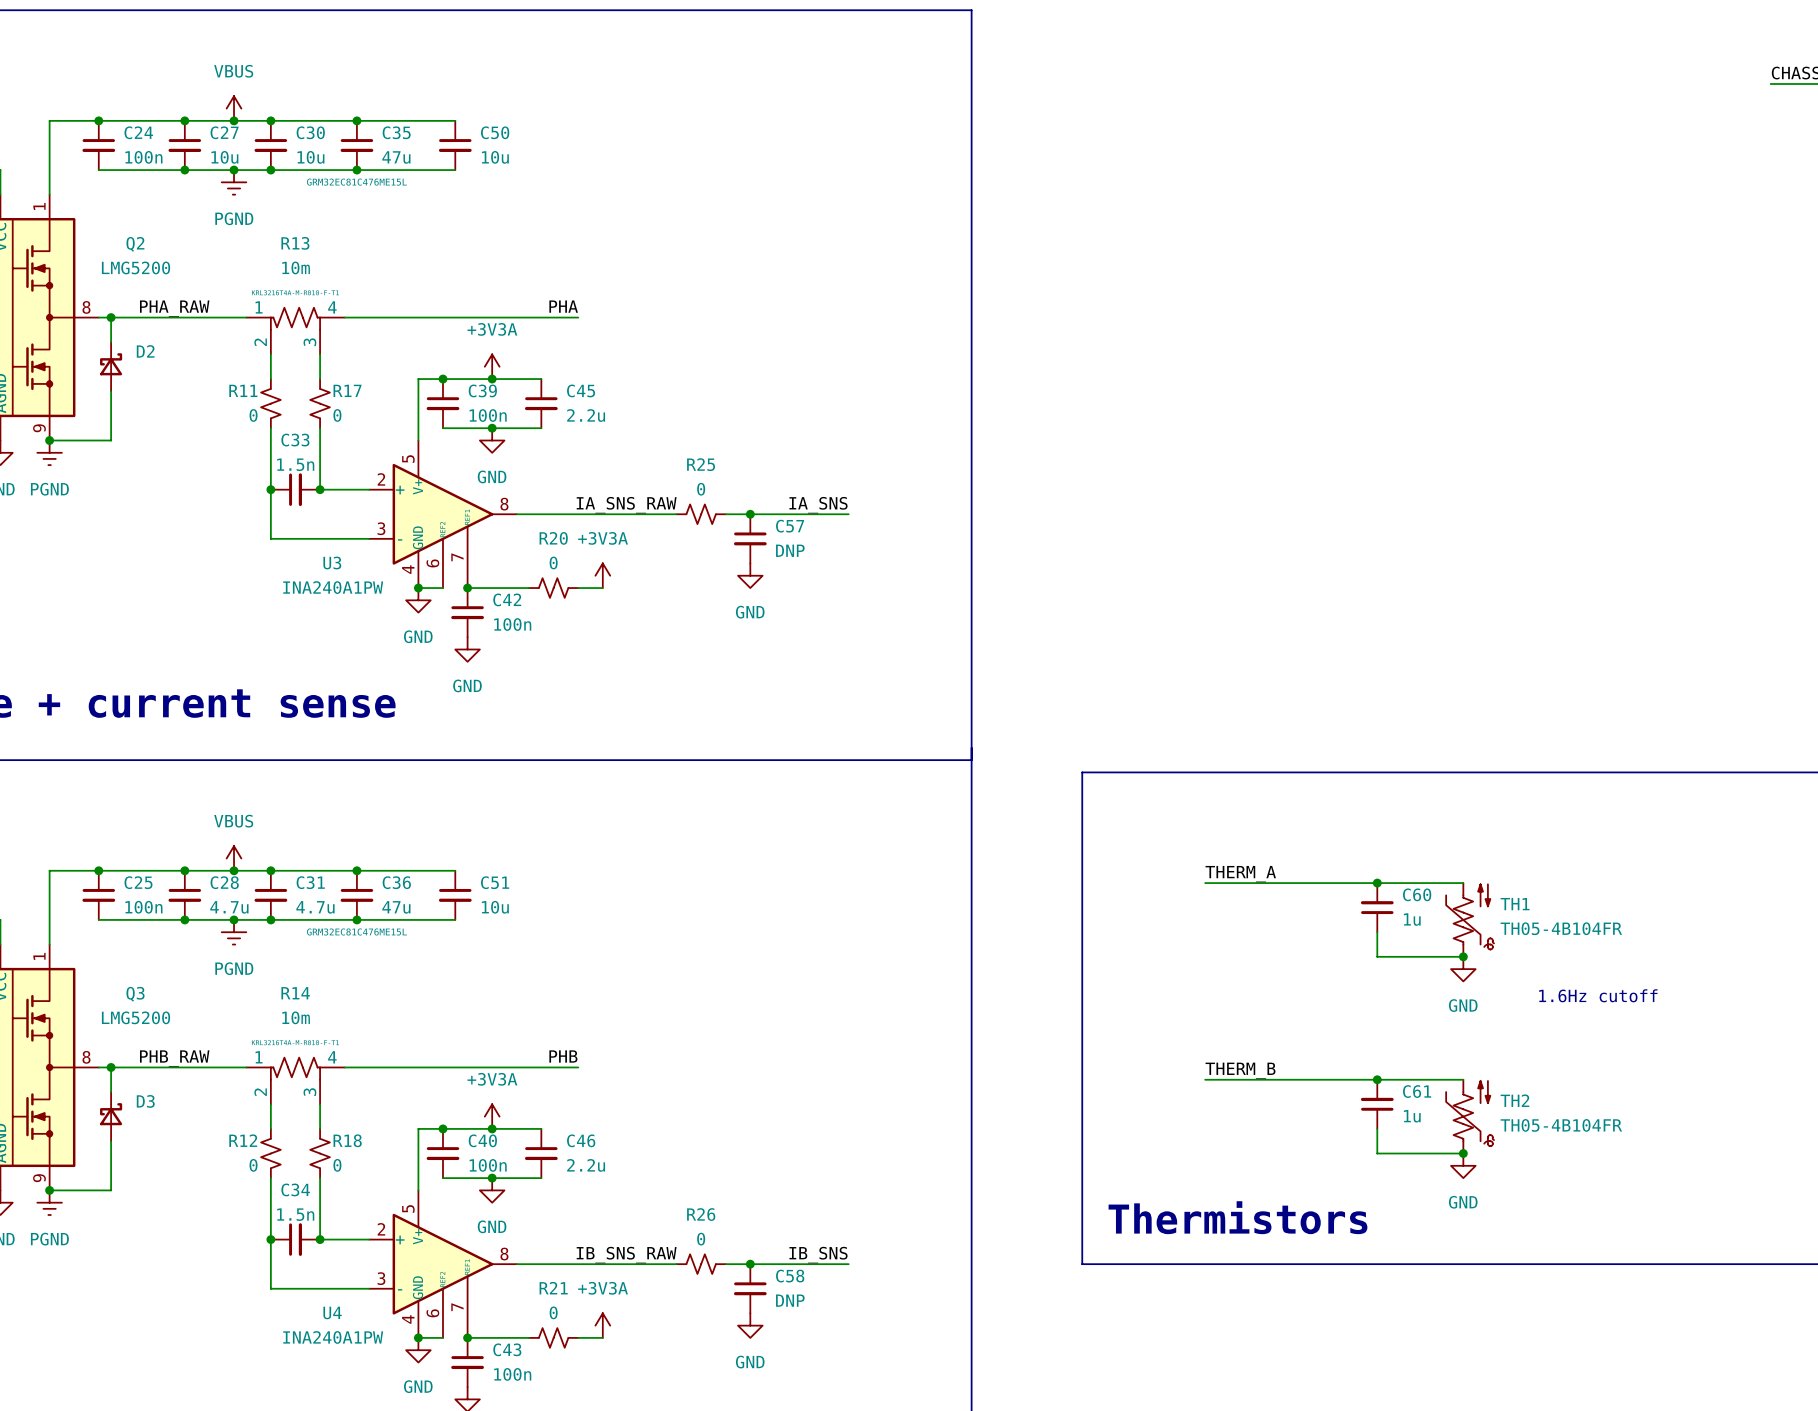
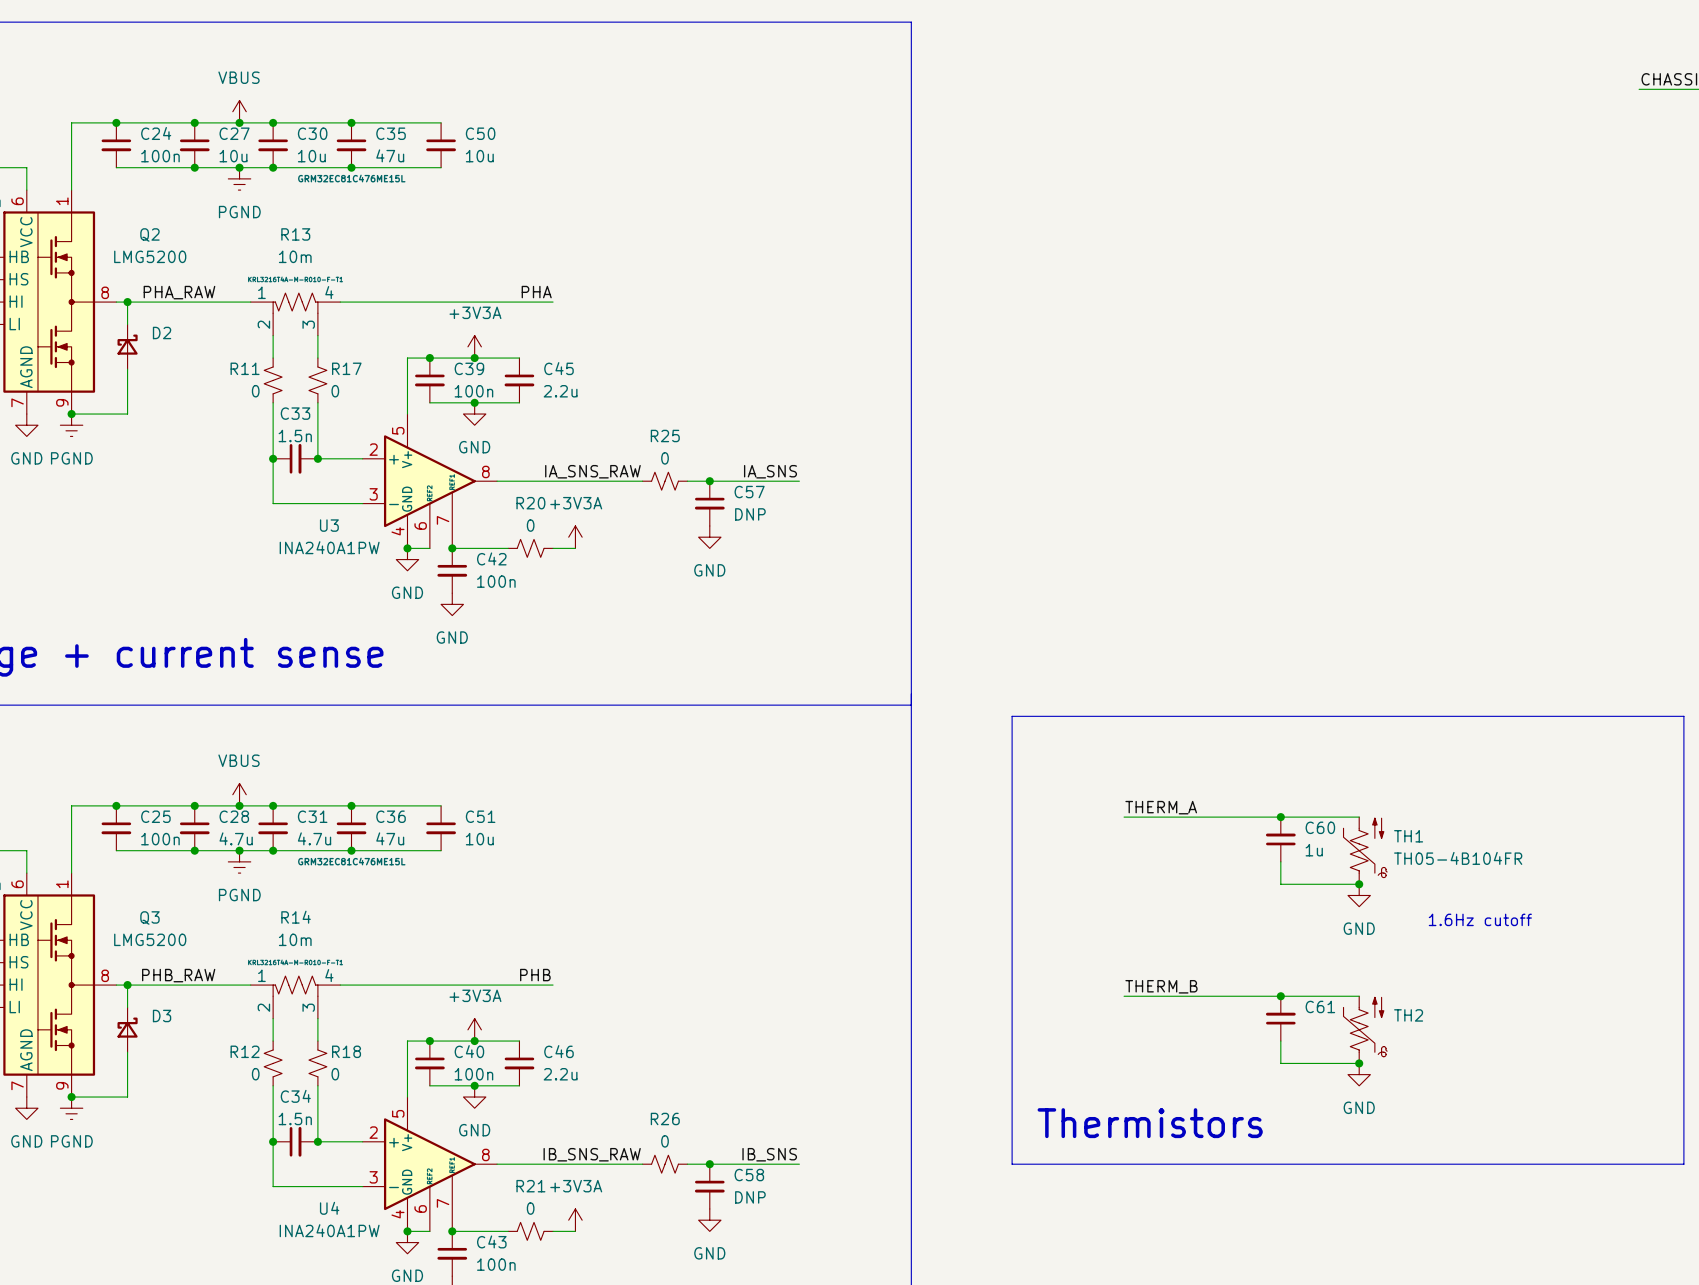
C61 value: 1u (1412, 1116) -> none
TH2 value: TH05-4B104FR (1561, 1125) -> none

